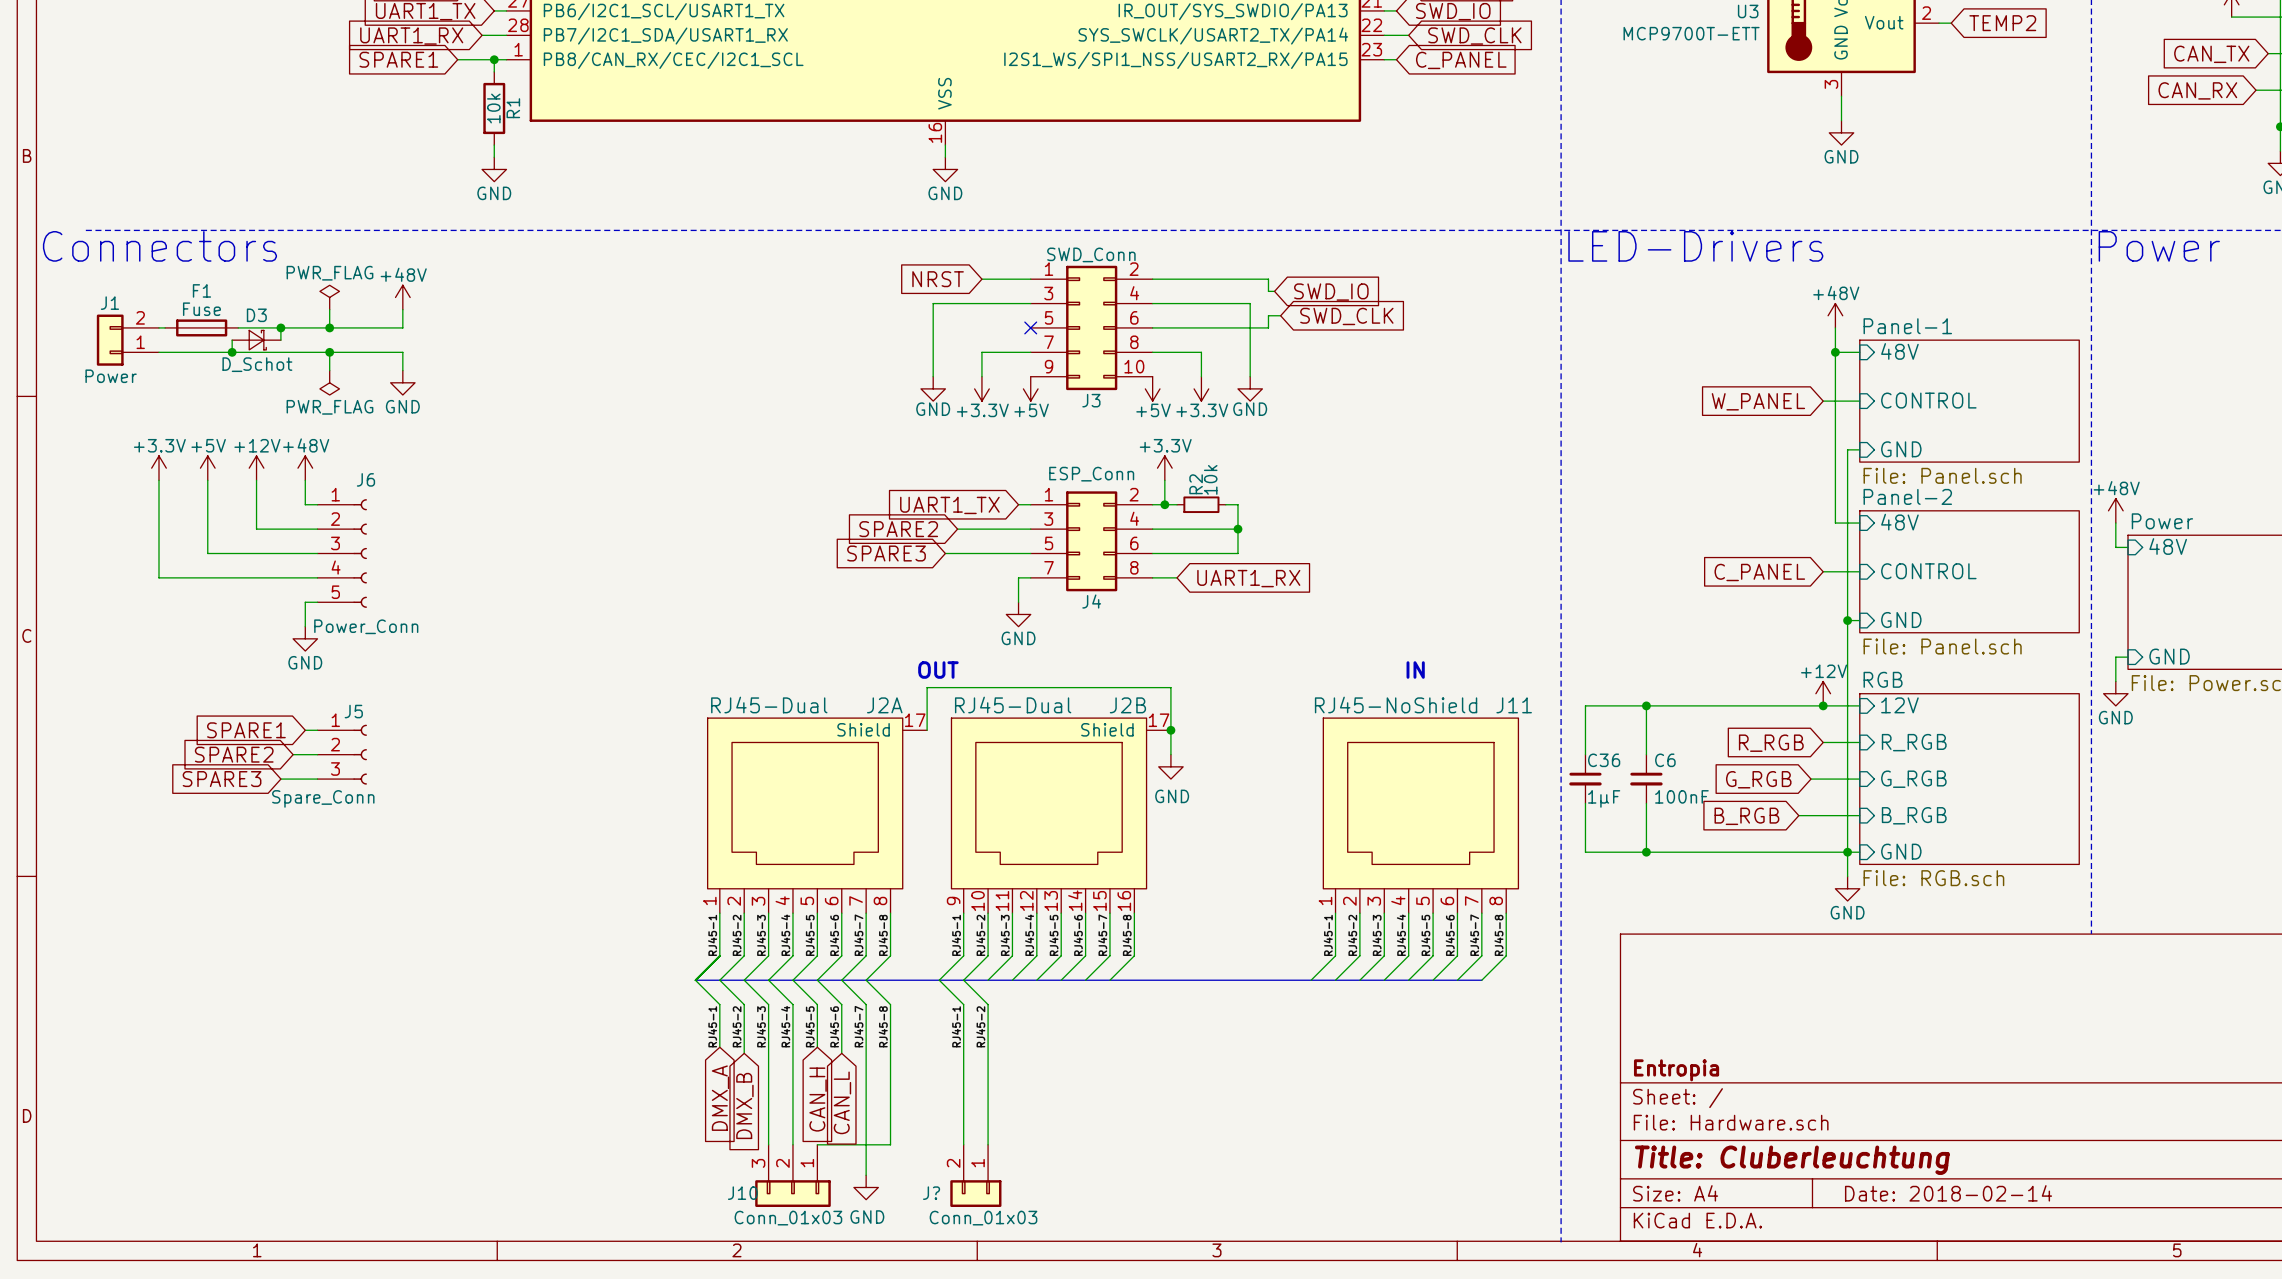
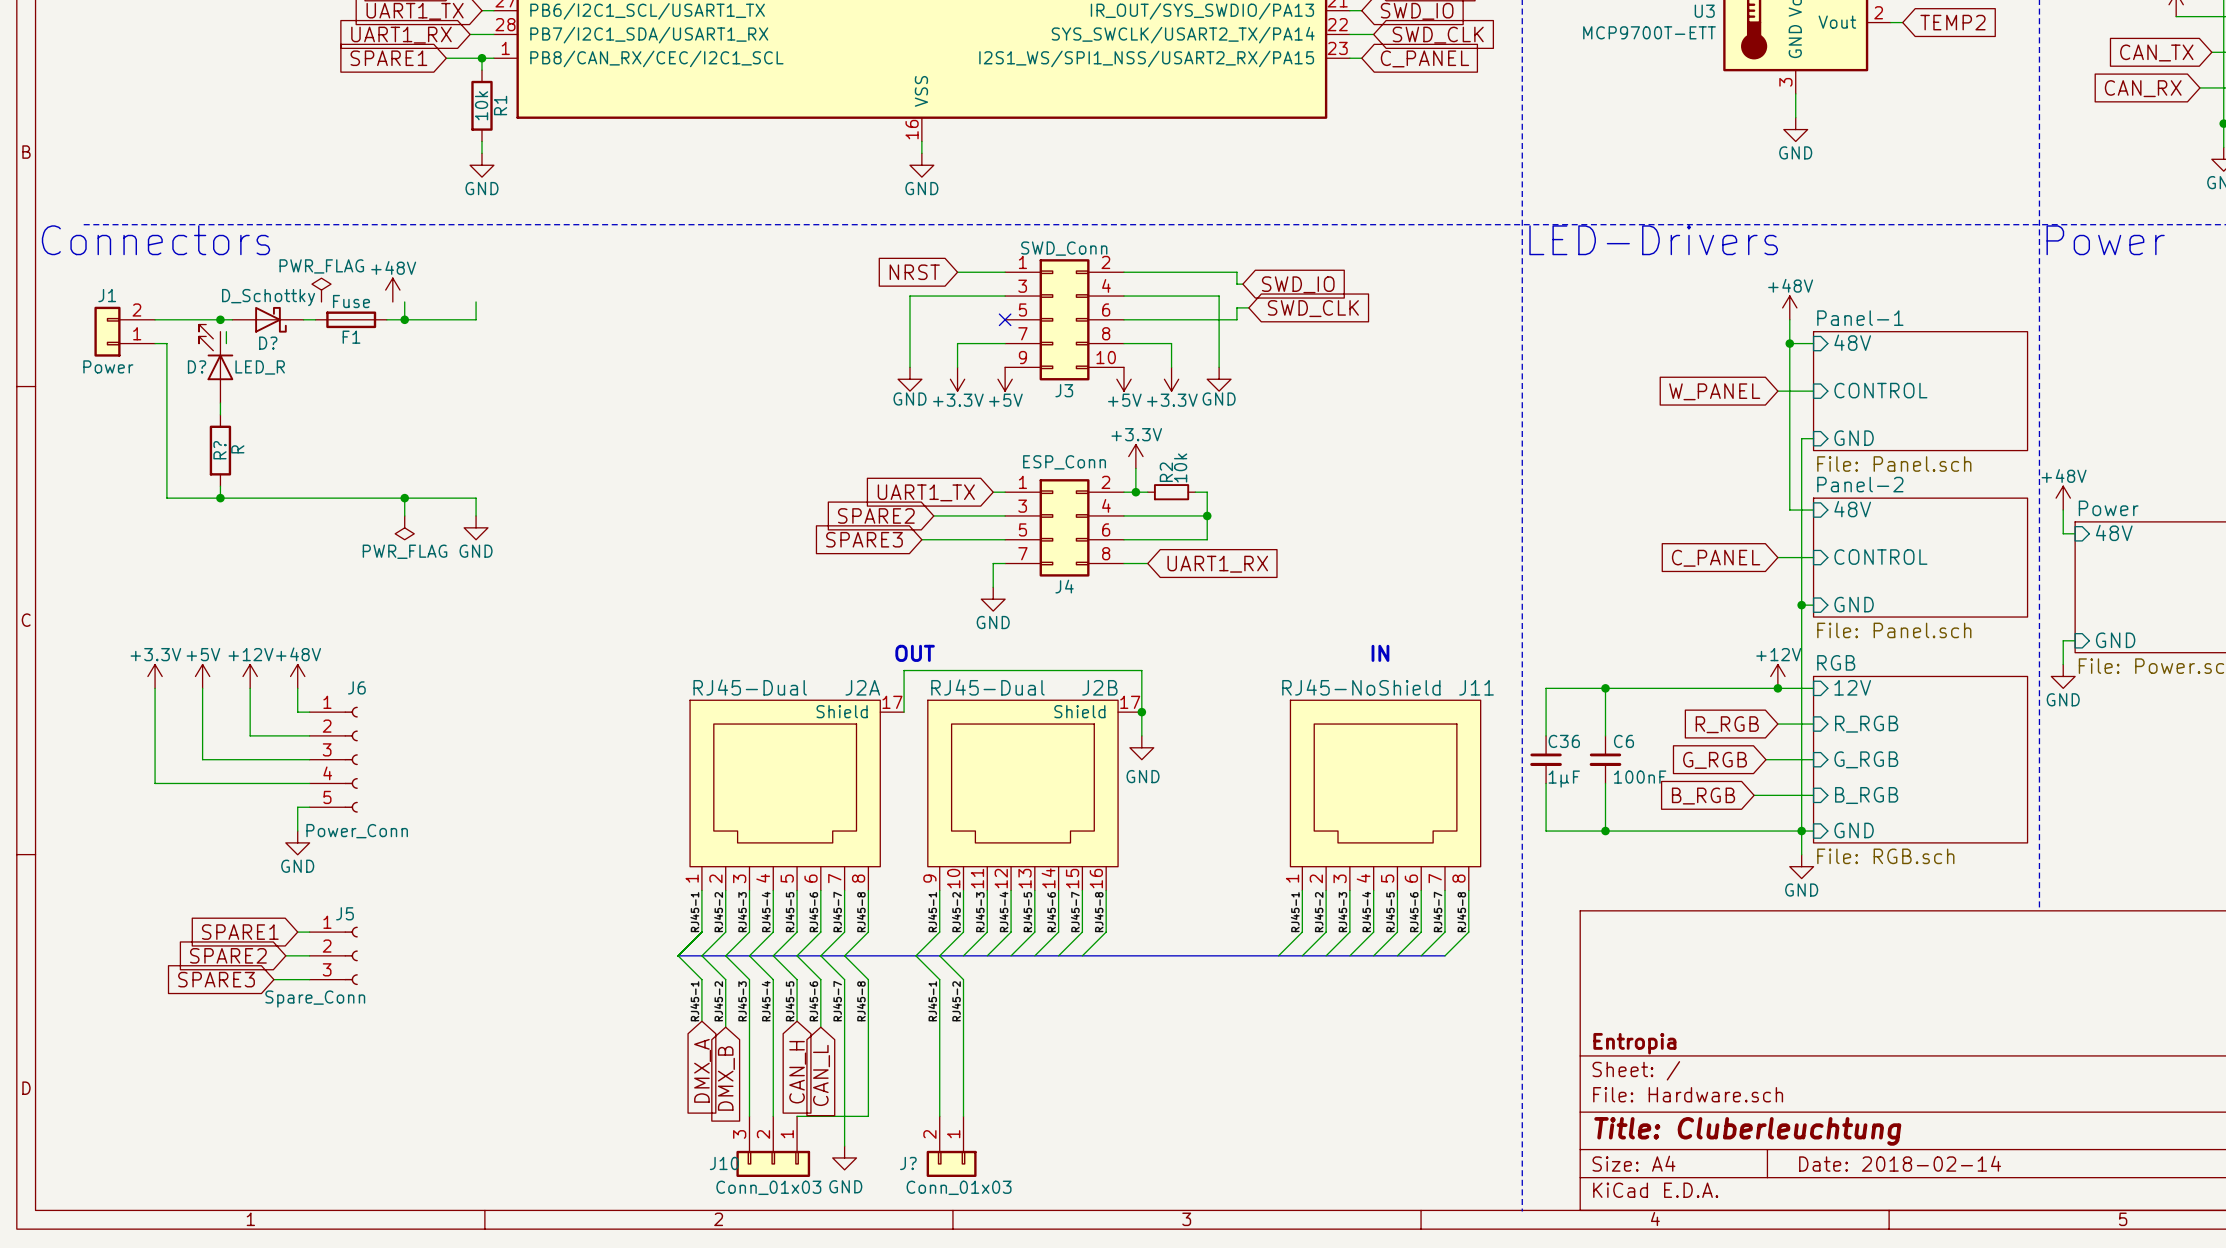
F1 name position: F1 (201, 290) -> F1 (351, 337)
wire: (329, 309) (329, 327) -> (404, 301) (404, 319)
wire: (402, 309) (402, 327) -> (476, 301) (476, 319) (392, 319)
F1 position: (201, 327) -> (351, 319)
D?: none -> D_Schottky (267, 319)
wire: (280, 327) (280, 340) -> (220, 403) (220, 414)
junction: (280, 327) -> none
junction: (329, 327) -> none
junction: none -> (404, 319)
D3: D_Schot (256, 340) -> none
wire: (171, 352) (402, 352) (402, 370) -> (166, 343) (166, 498) (476, 498) (476, 515)
junction position: (232, 352) -> (220, 319)
wire: (329, 352) (329, 370) -> (404, 498) (404, 515)
junction: (329, 352) -> none
D?: none -> LED_R (216, 363)
power symbol position: PWR_FLAG (329, 382) -> PWR_FLAG (404, 527)
power symbol: GND (402, 382) -> none
R?: none -> R (220, 450)
power symbol position: +3.3V (159, 468) -> +3.3V (155, 676)
power symbol position: +5V (207, 468) -> +5V (202, 676)
power symbol position: +12V (256, 468) -> +12V (250, 676)
power symbol position: +48V (305, 468) -> +48V (297, 676)
wire: (159, 480) (159, 577) (317, 577) -> (155, 688) (155, 783) (309, 783)
wire: (207, 480) (207, 553) (317, 553) -> none
wire: (256, 480) (256, 529) (317, 529) -> none
wire: (305, 480) (305, 504) (317, 504) -> none
wire: none -> (220, 486) (220, 498)
junction: none -> (220, 498)
junction: none -> (404, 498)
power symbol: none -> GND (476, 527)
J6 position: (342, 553) -> (333, 759)
wire: (317, 602) (305, 602) (305, 626) -> (309, 807) (297, 807) (297, 831)
power symbol: GND (305, 638) -> none
wire: none -> (202, 688) (202, 759) (273, 759)
wire: none -> (250, 688) (250, 735) (285, 735)
wire: none -> (297, 688) (297, 712)
global label position: SPARE1 (246, 730) -> SPARE1 (240, 932)
global label position: SPARE2 (234, 754) -> SPARE2 (228, 955)
J5 position: (342, 754) -> (333, 955)
global label position: SPARE3 (222, 779) -> SPARE3 (216, 979)
power symbol: none -> GND (297, 842)
wire: none -> (297, 932) (309, 932)
wire: none -> (285, 955) (309, 955)
wire: none -> (273, 979) (309, 979)

